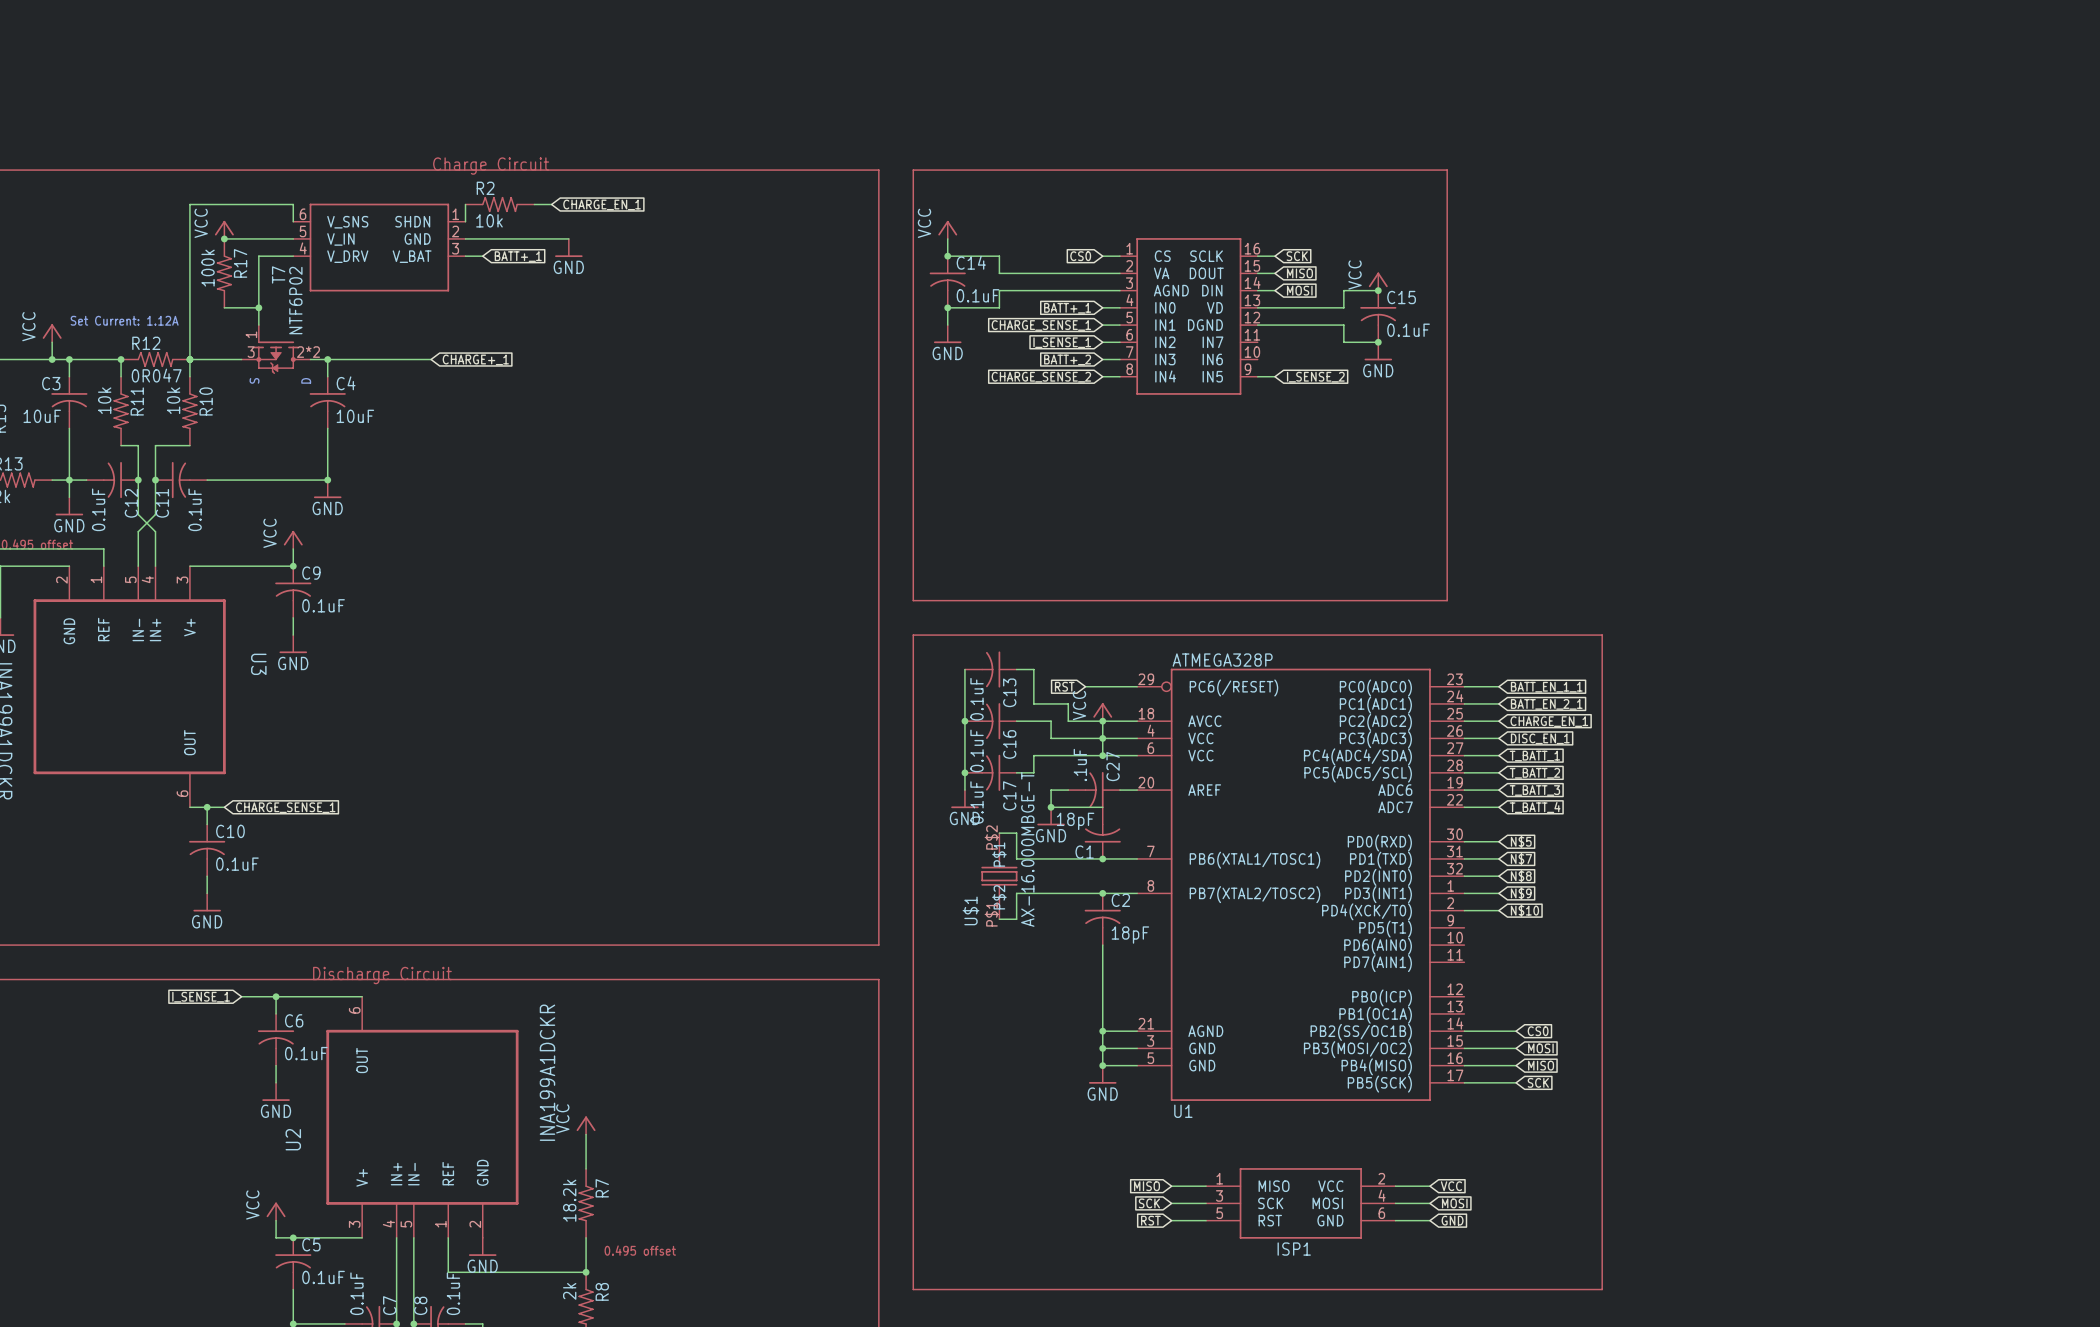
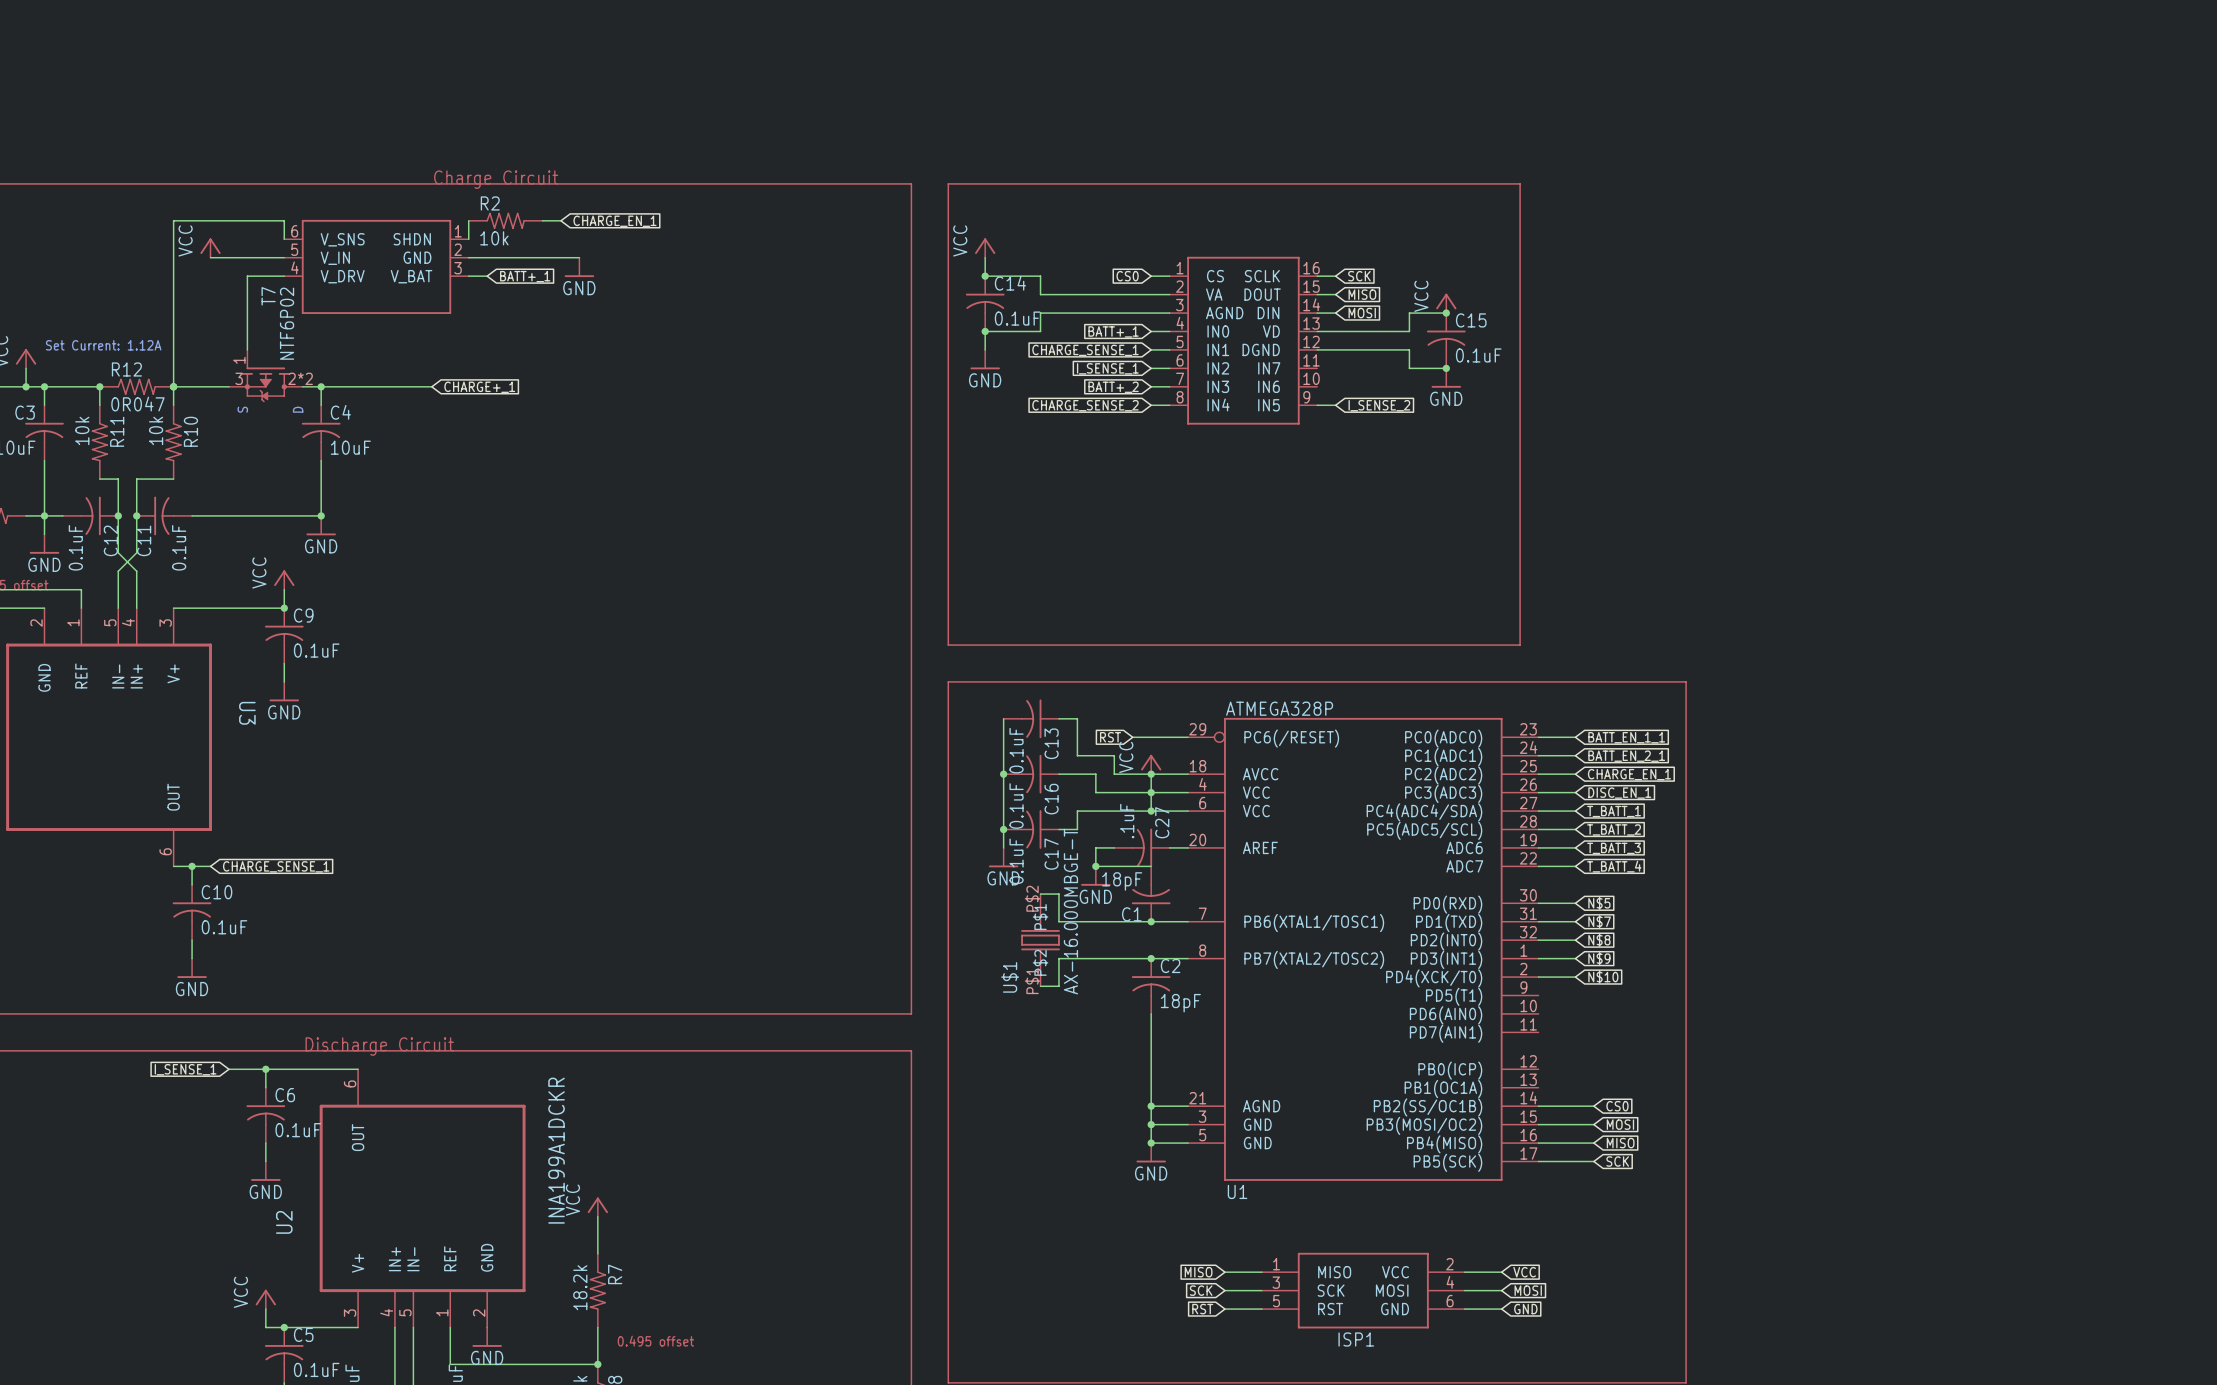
junction: (224, 238) -> none
R17: 100k (224, 273) -> none
wire: (224, 307) (258, 307) -> none
junction: (258, 307) -> none

